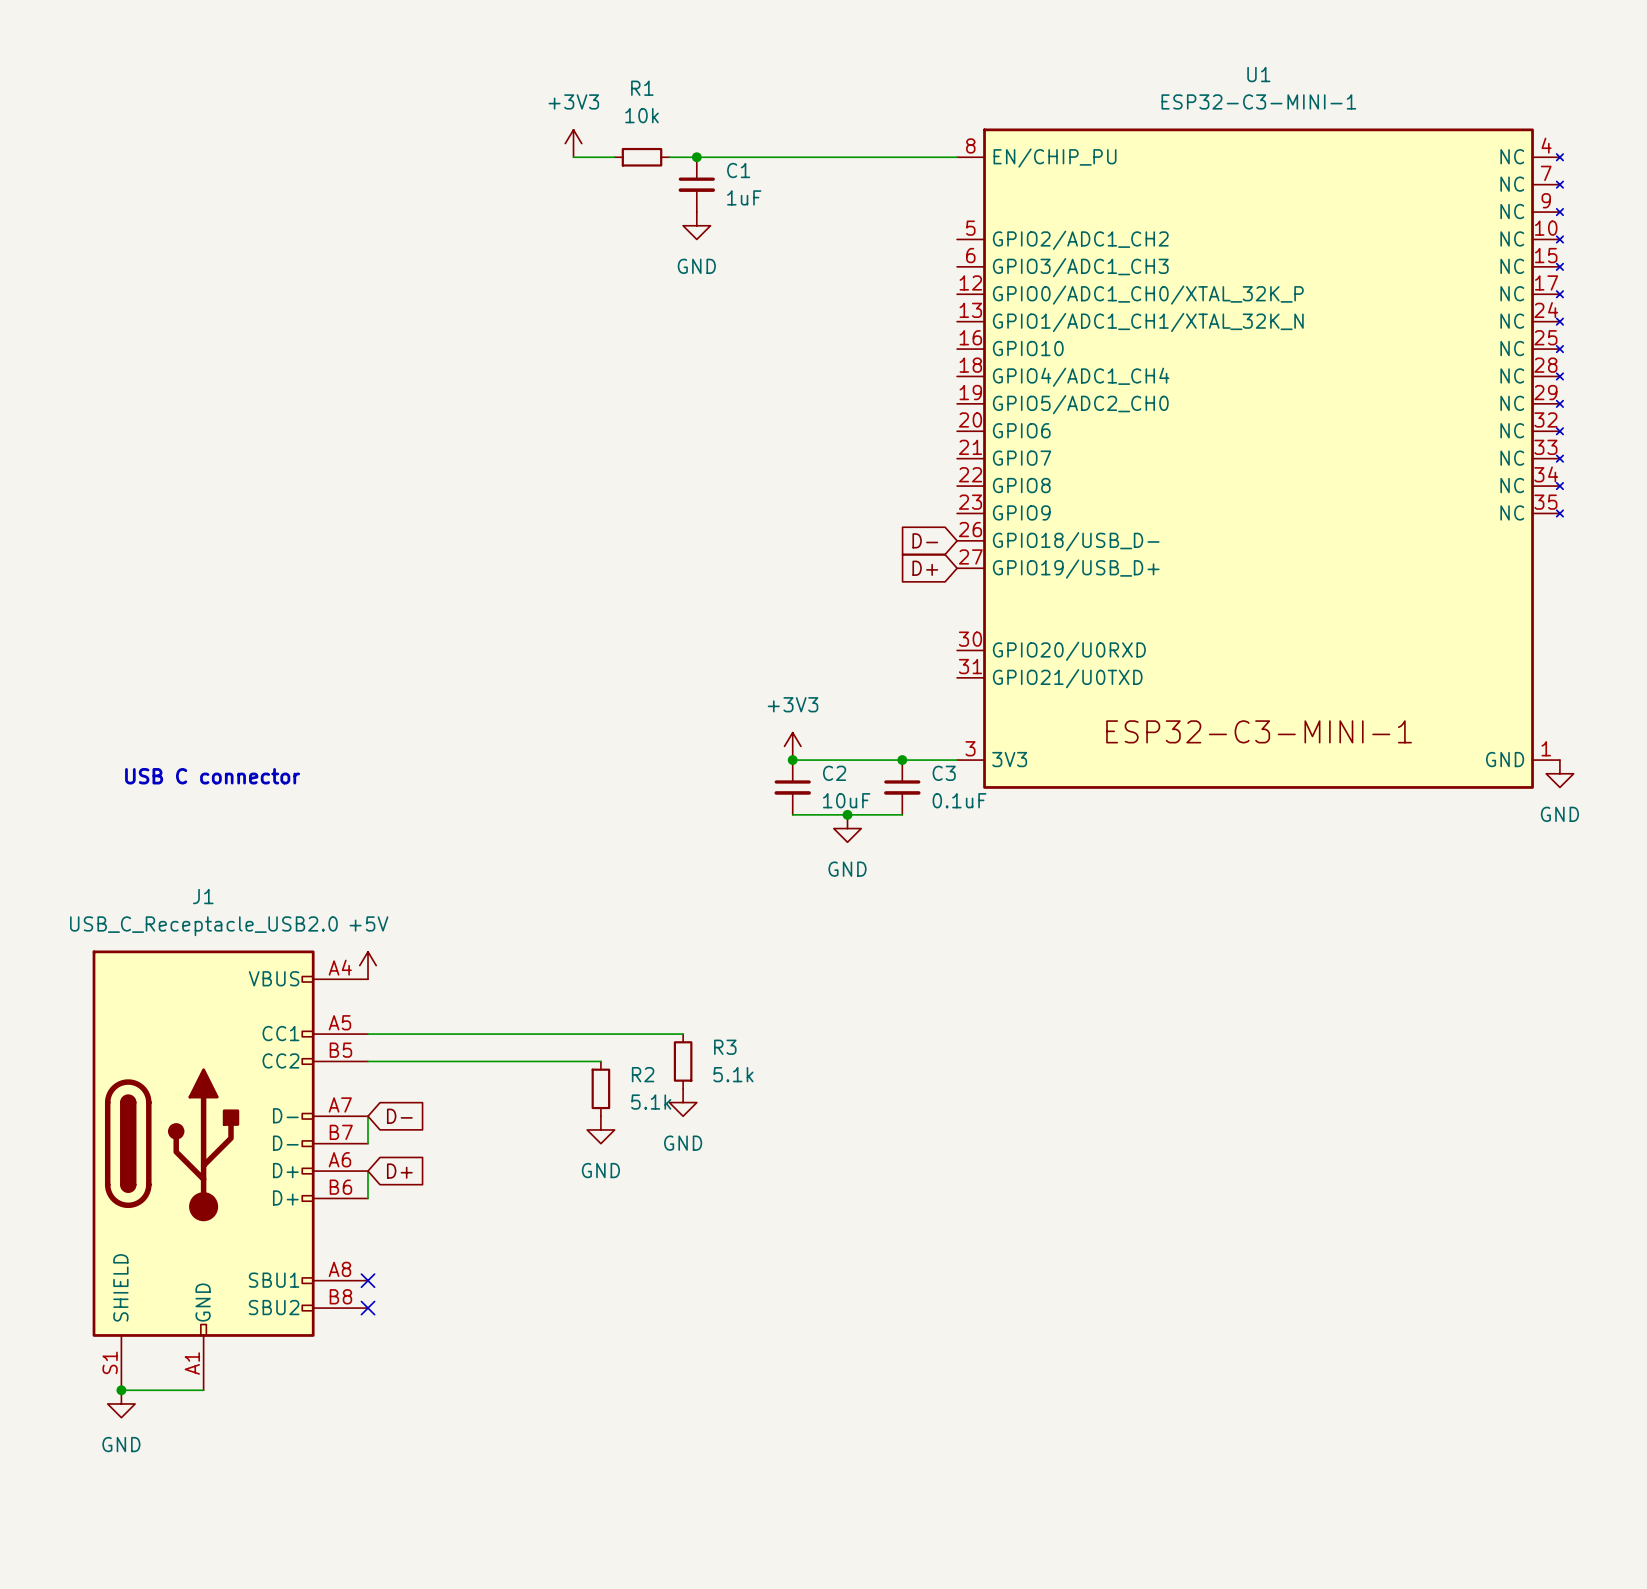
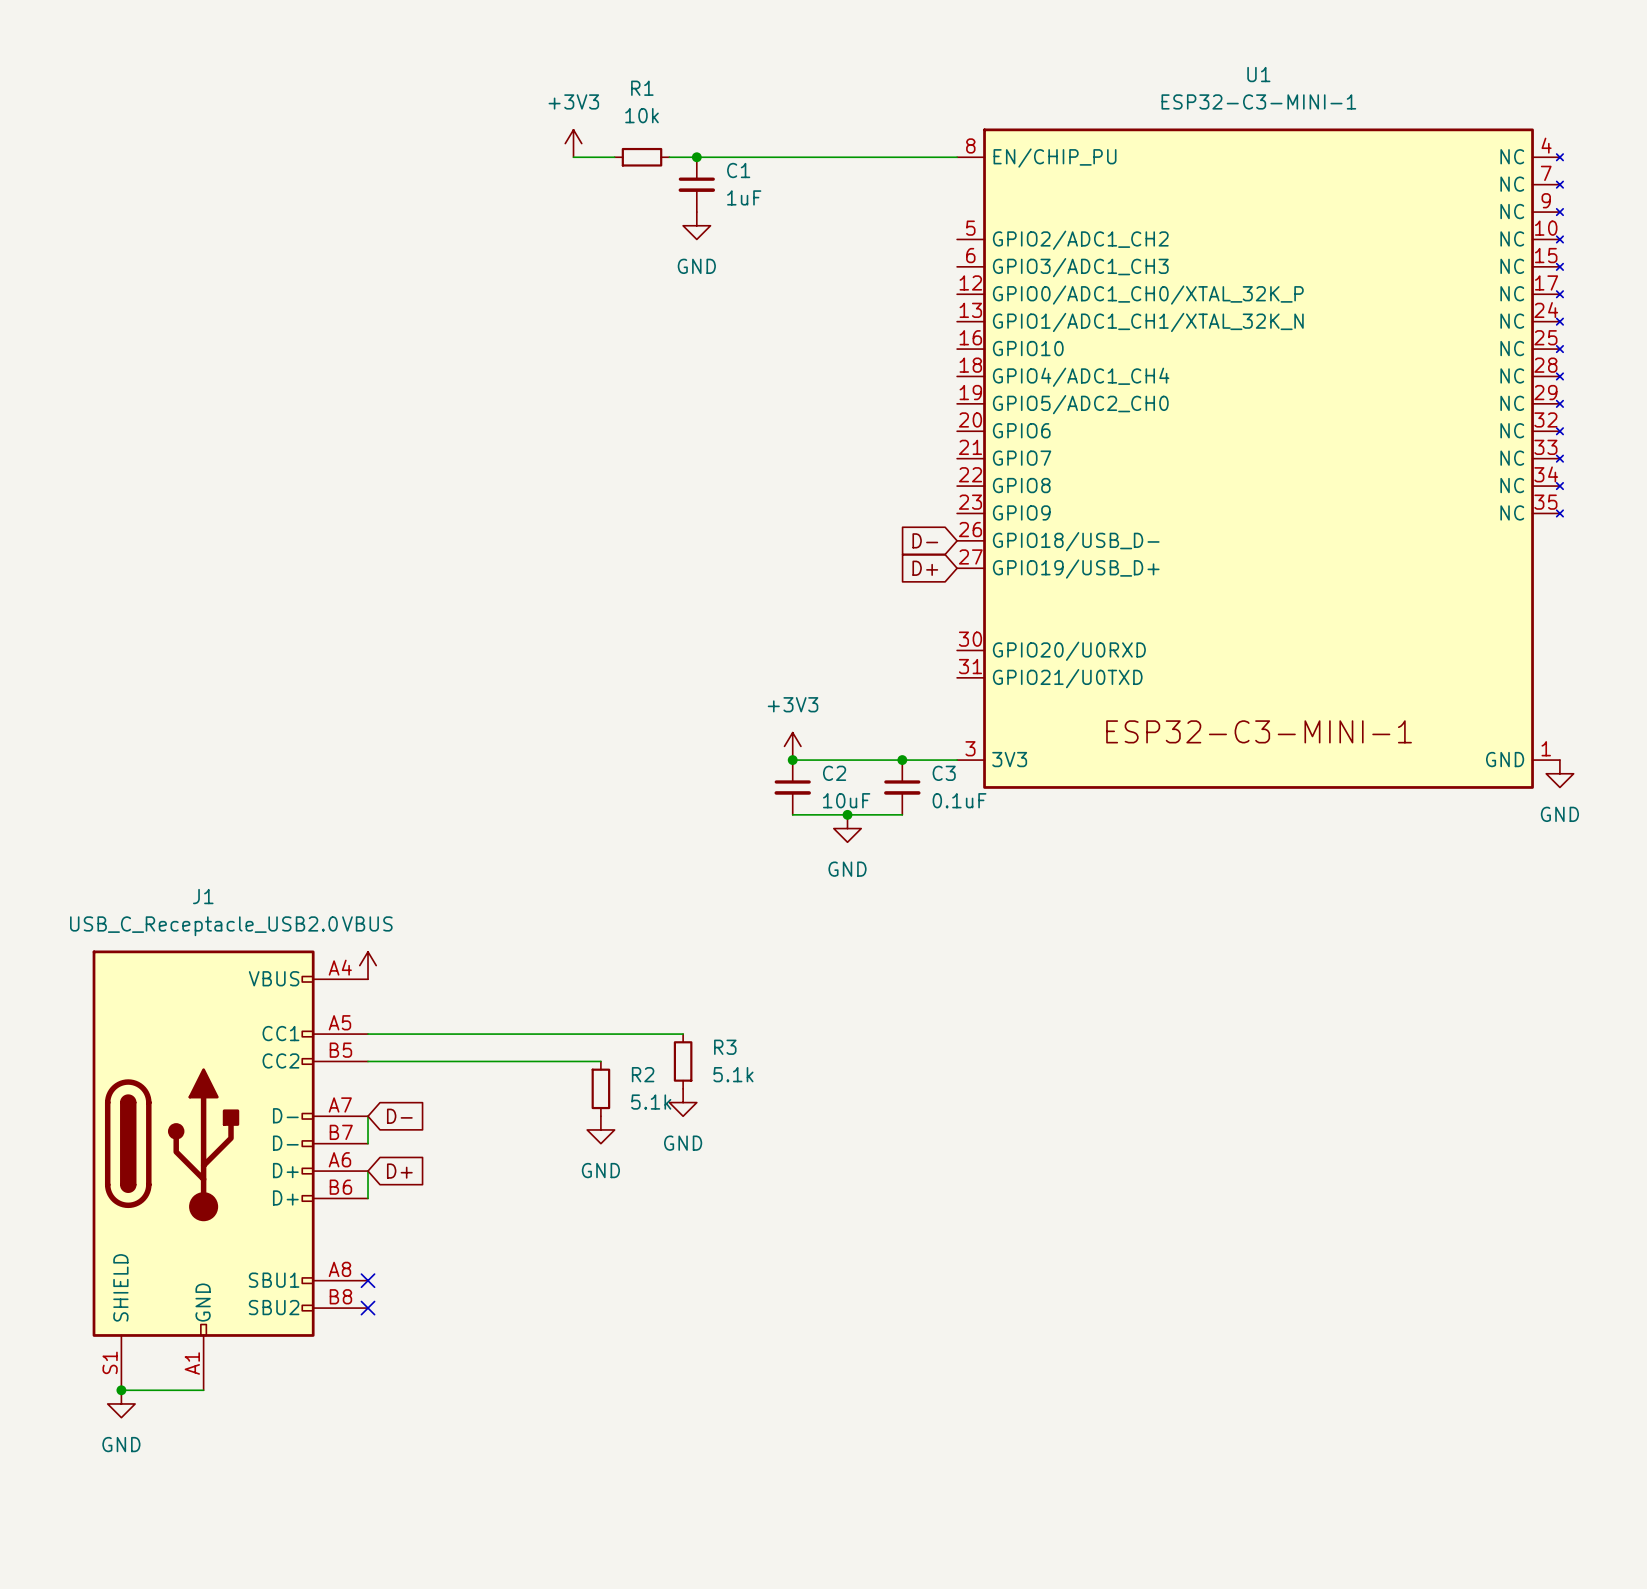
text: USB C connector (212, 776) -> none
power symbol: +5V (368, 965) -> VBUS (368, 965)

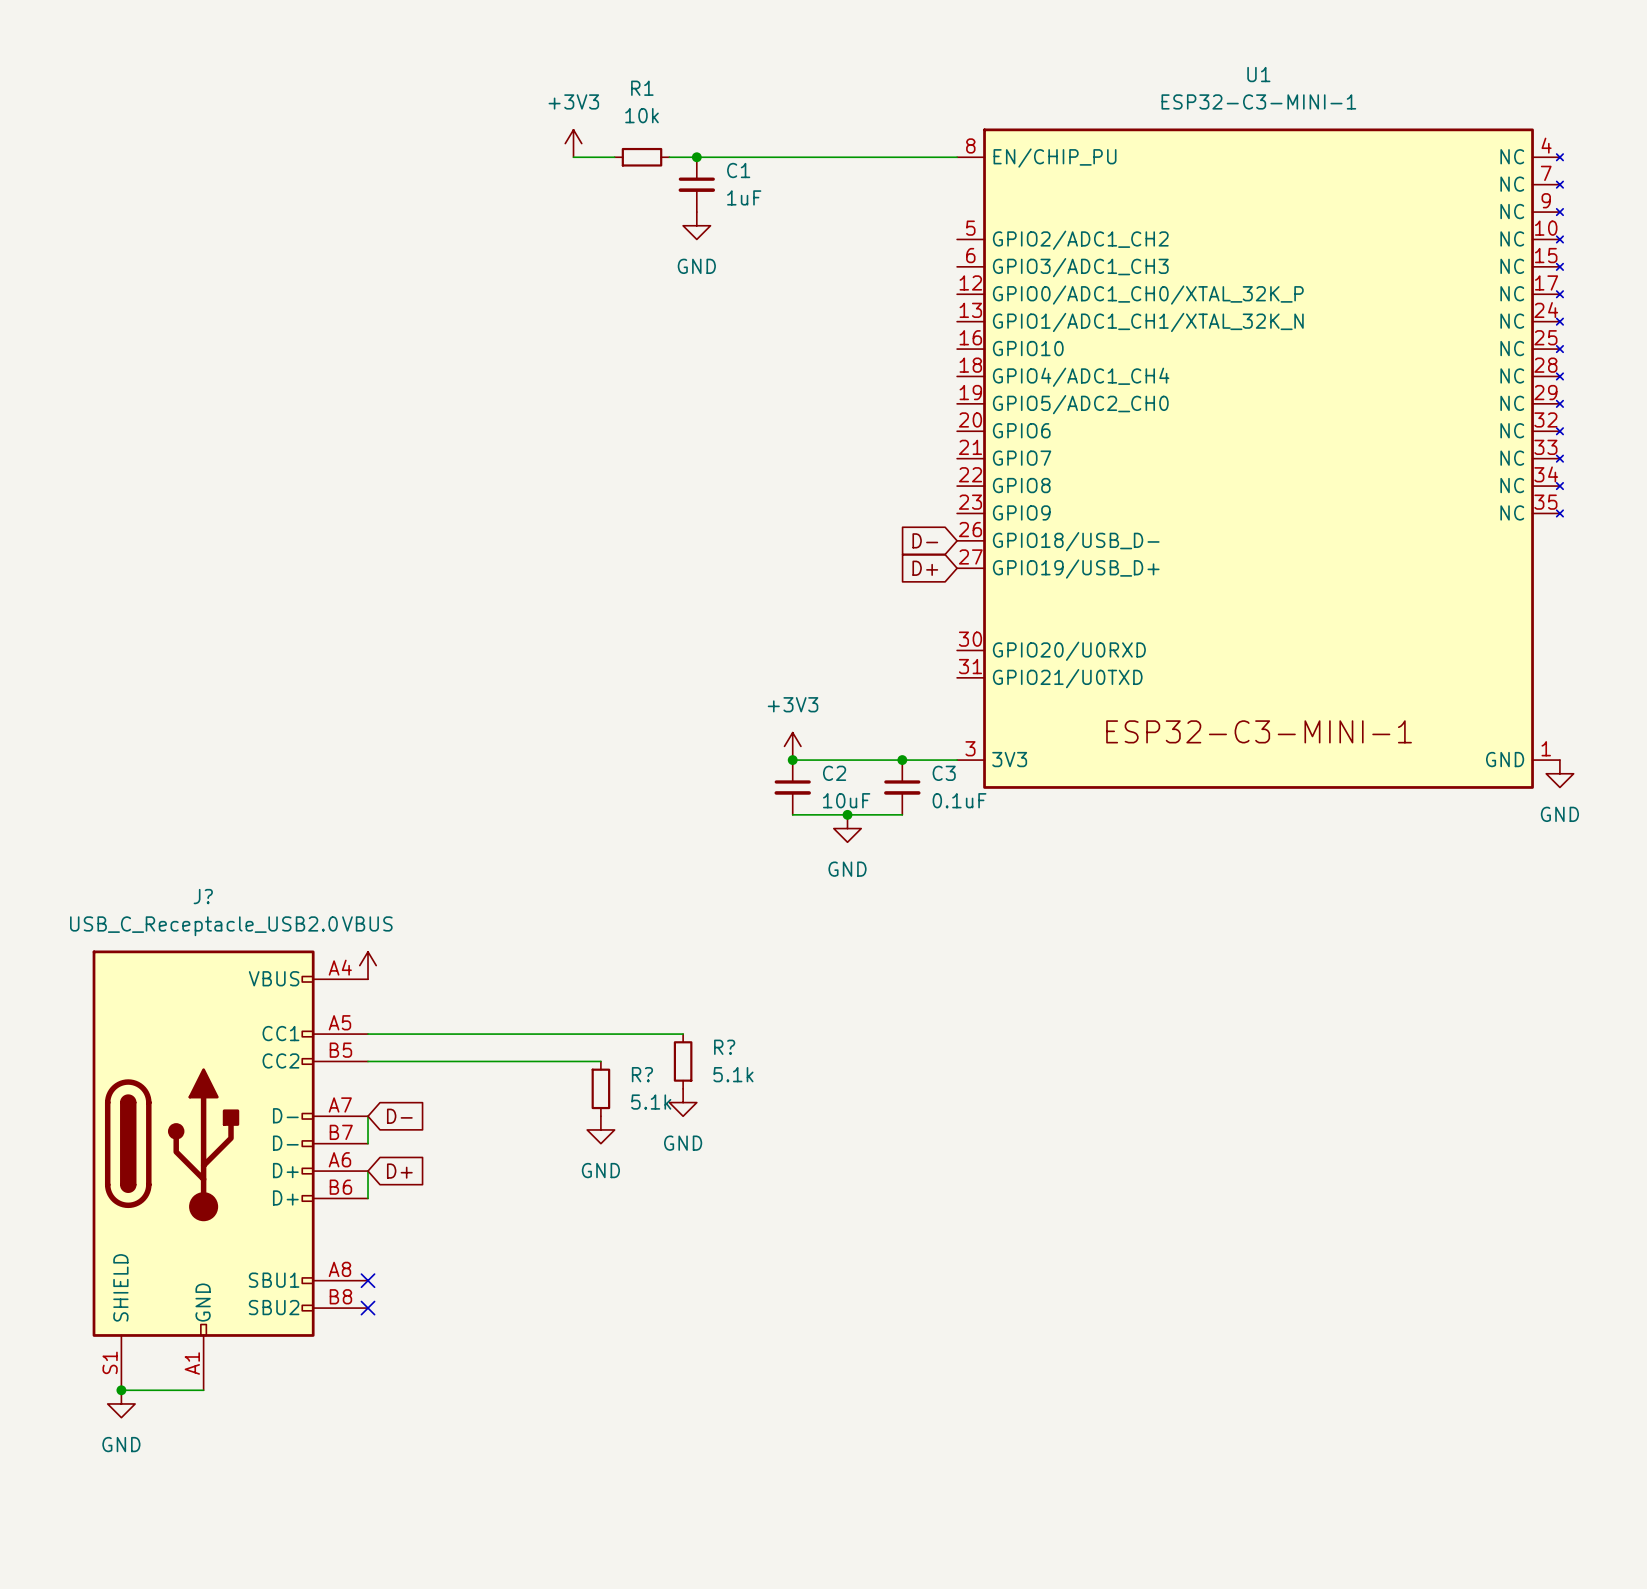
J1 name: J1 (203, 896) -> J? (203, 896)
R3 name: R3 (725, 1047) -> R? (724, 1047)
R2 name: R2 (643, 1074) -> R? (642, 1074)

